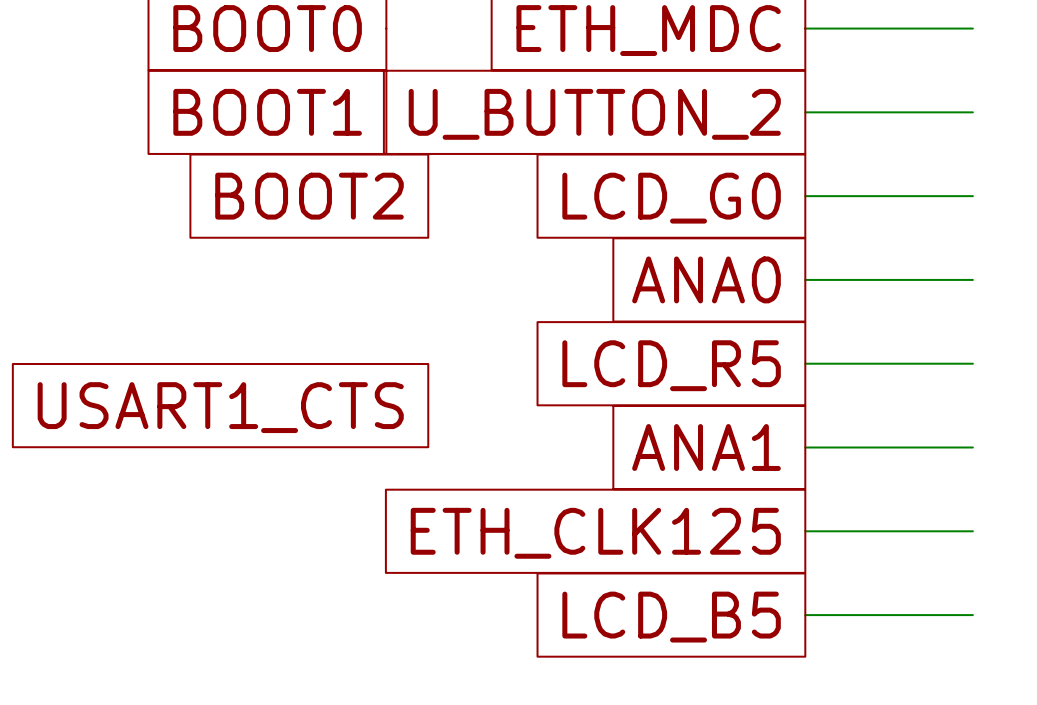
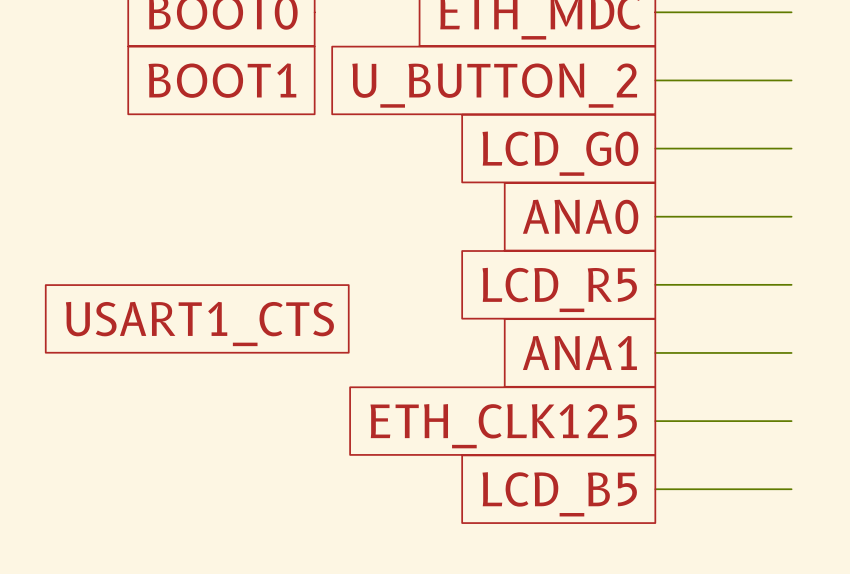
global label: BOOT2 (309, 196) -> none

